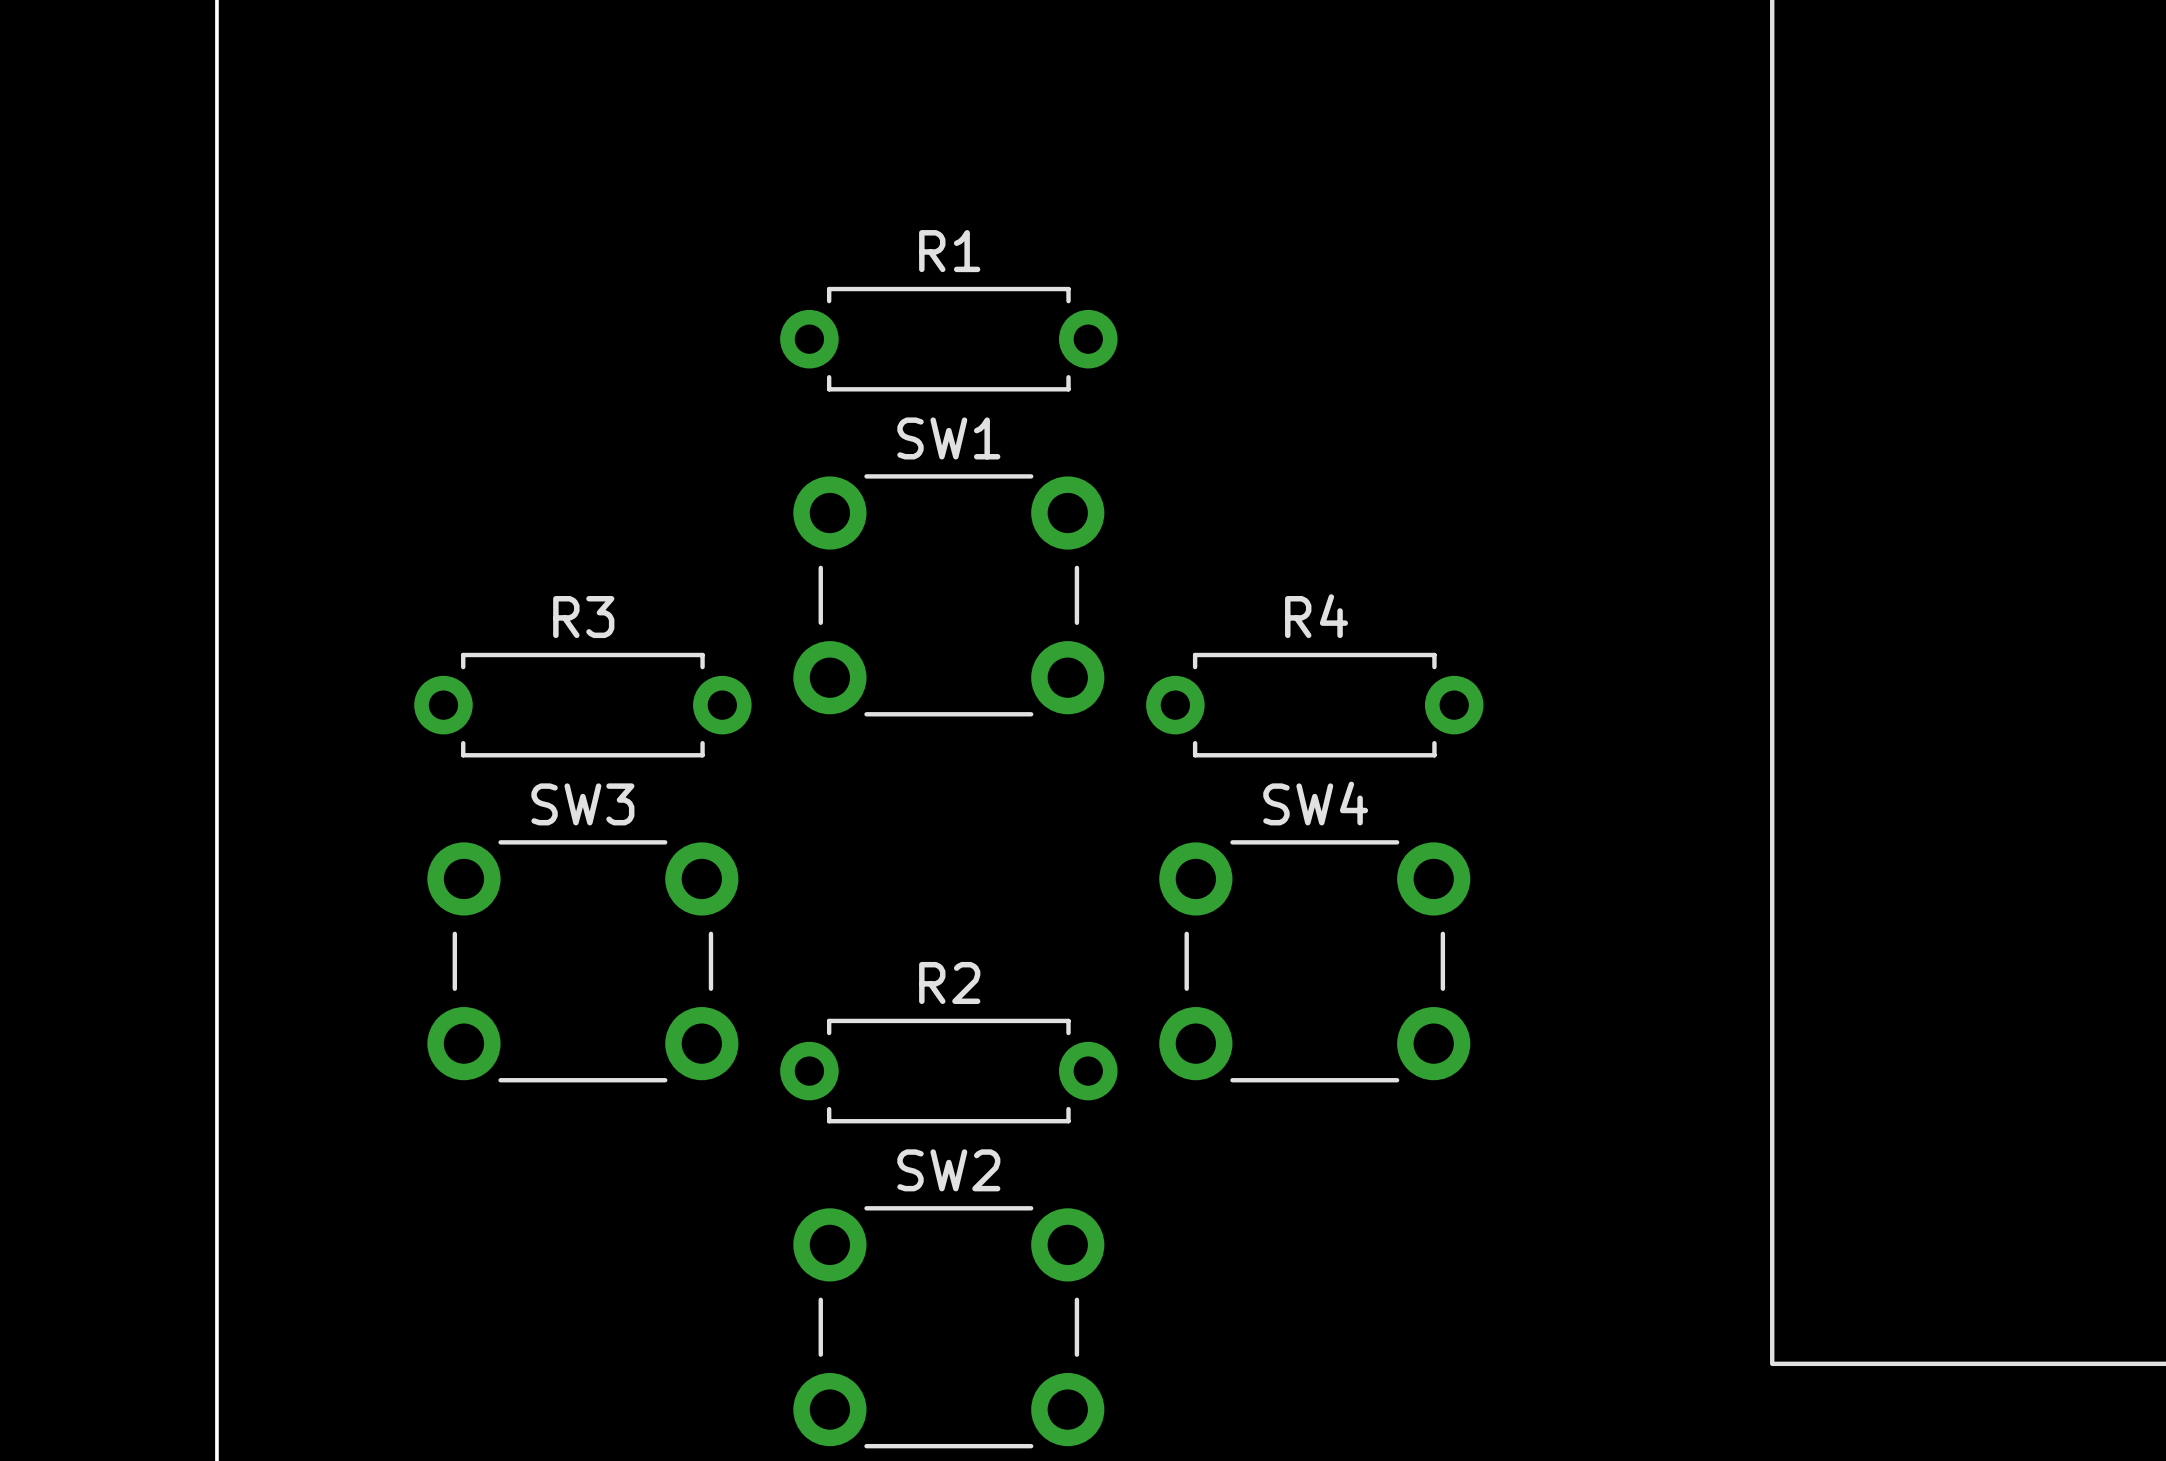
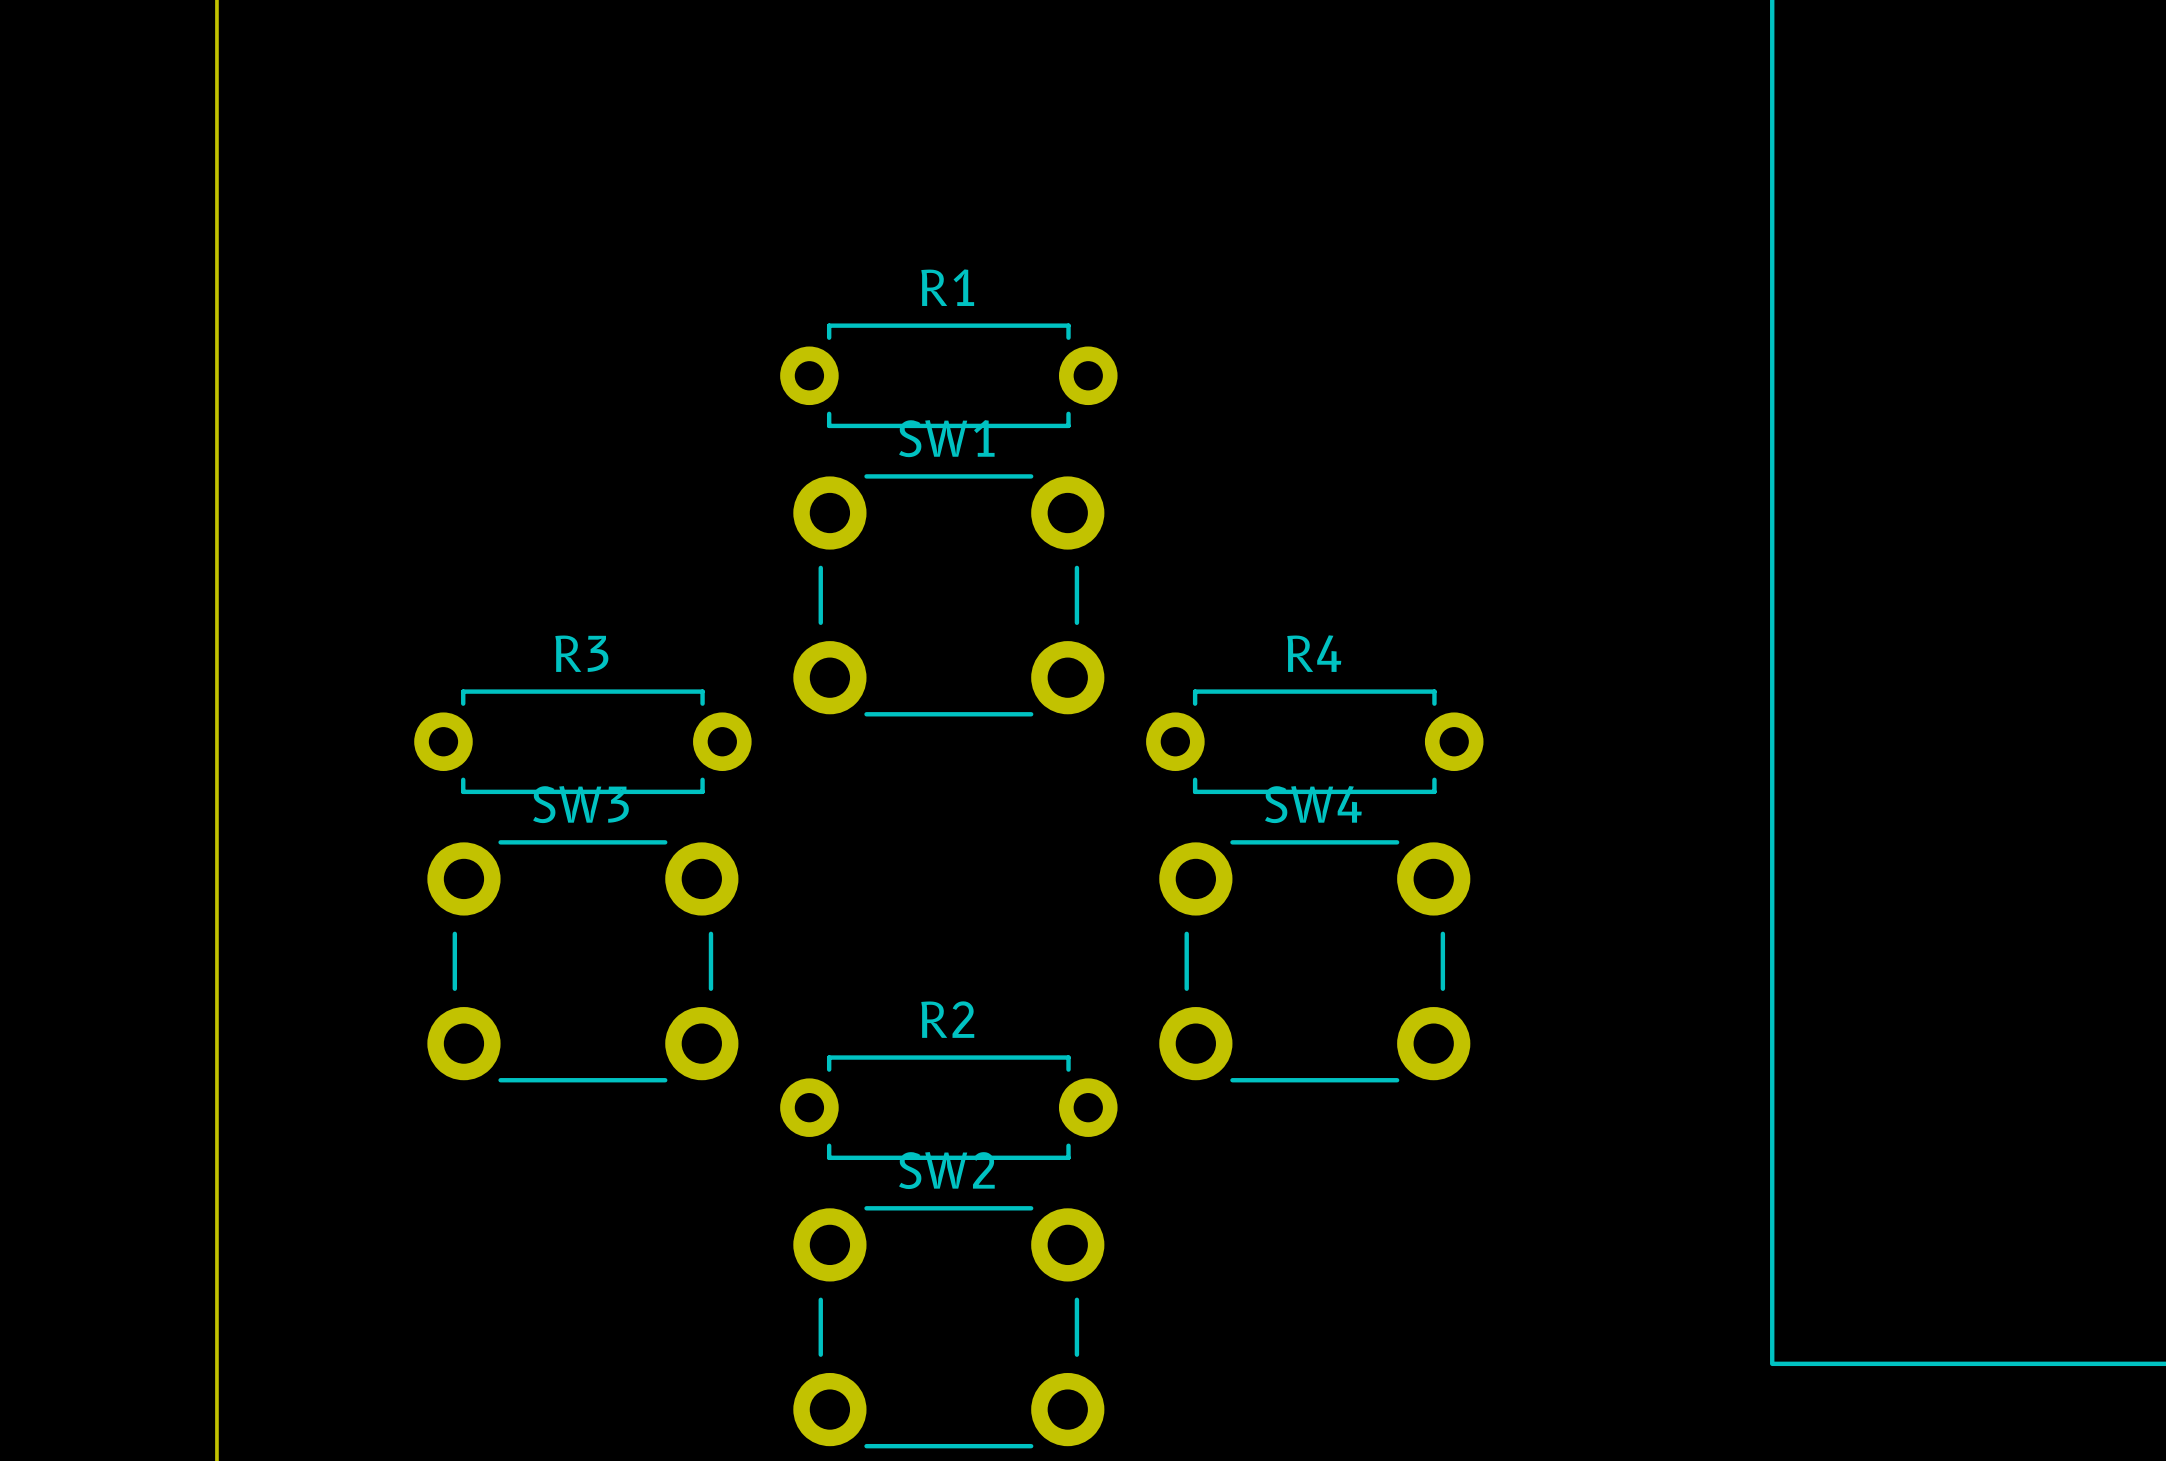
R1 position: (948, 339) -> (948, 375)
R3 position: (582, 705) -> (582, 741)
R4 position: (1314, 705) -> (1314, 741)
R2 position: (948, 1071) -> (948, 1107)

